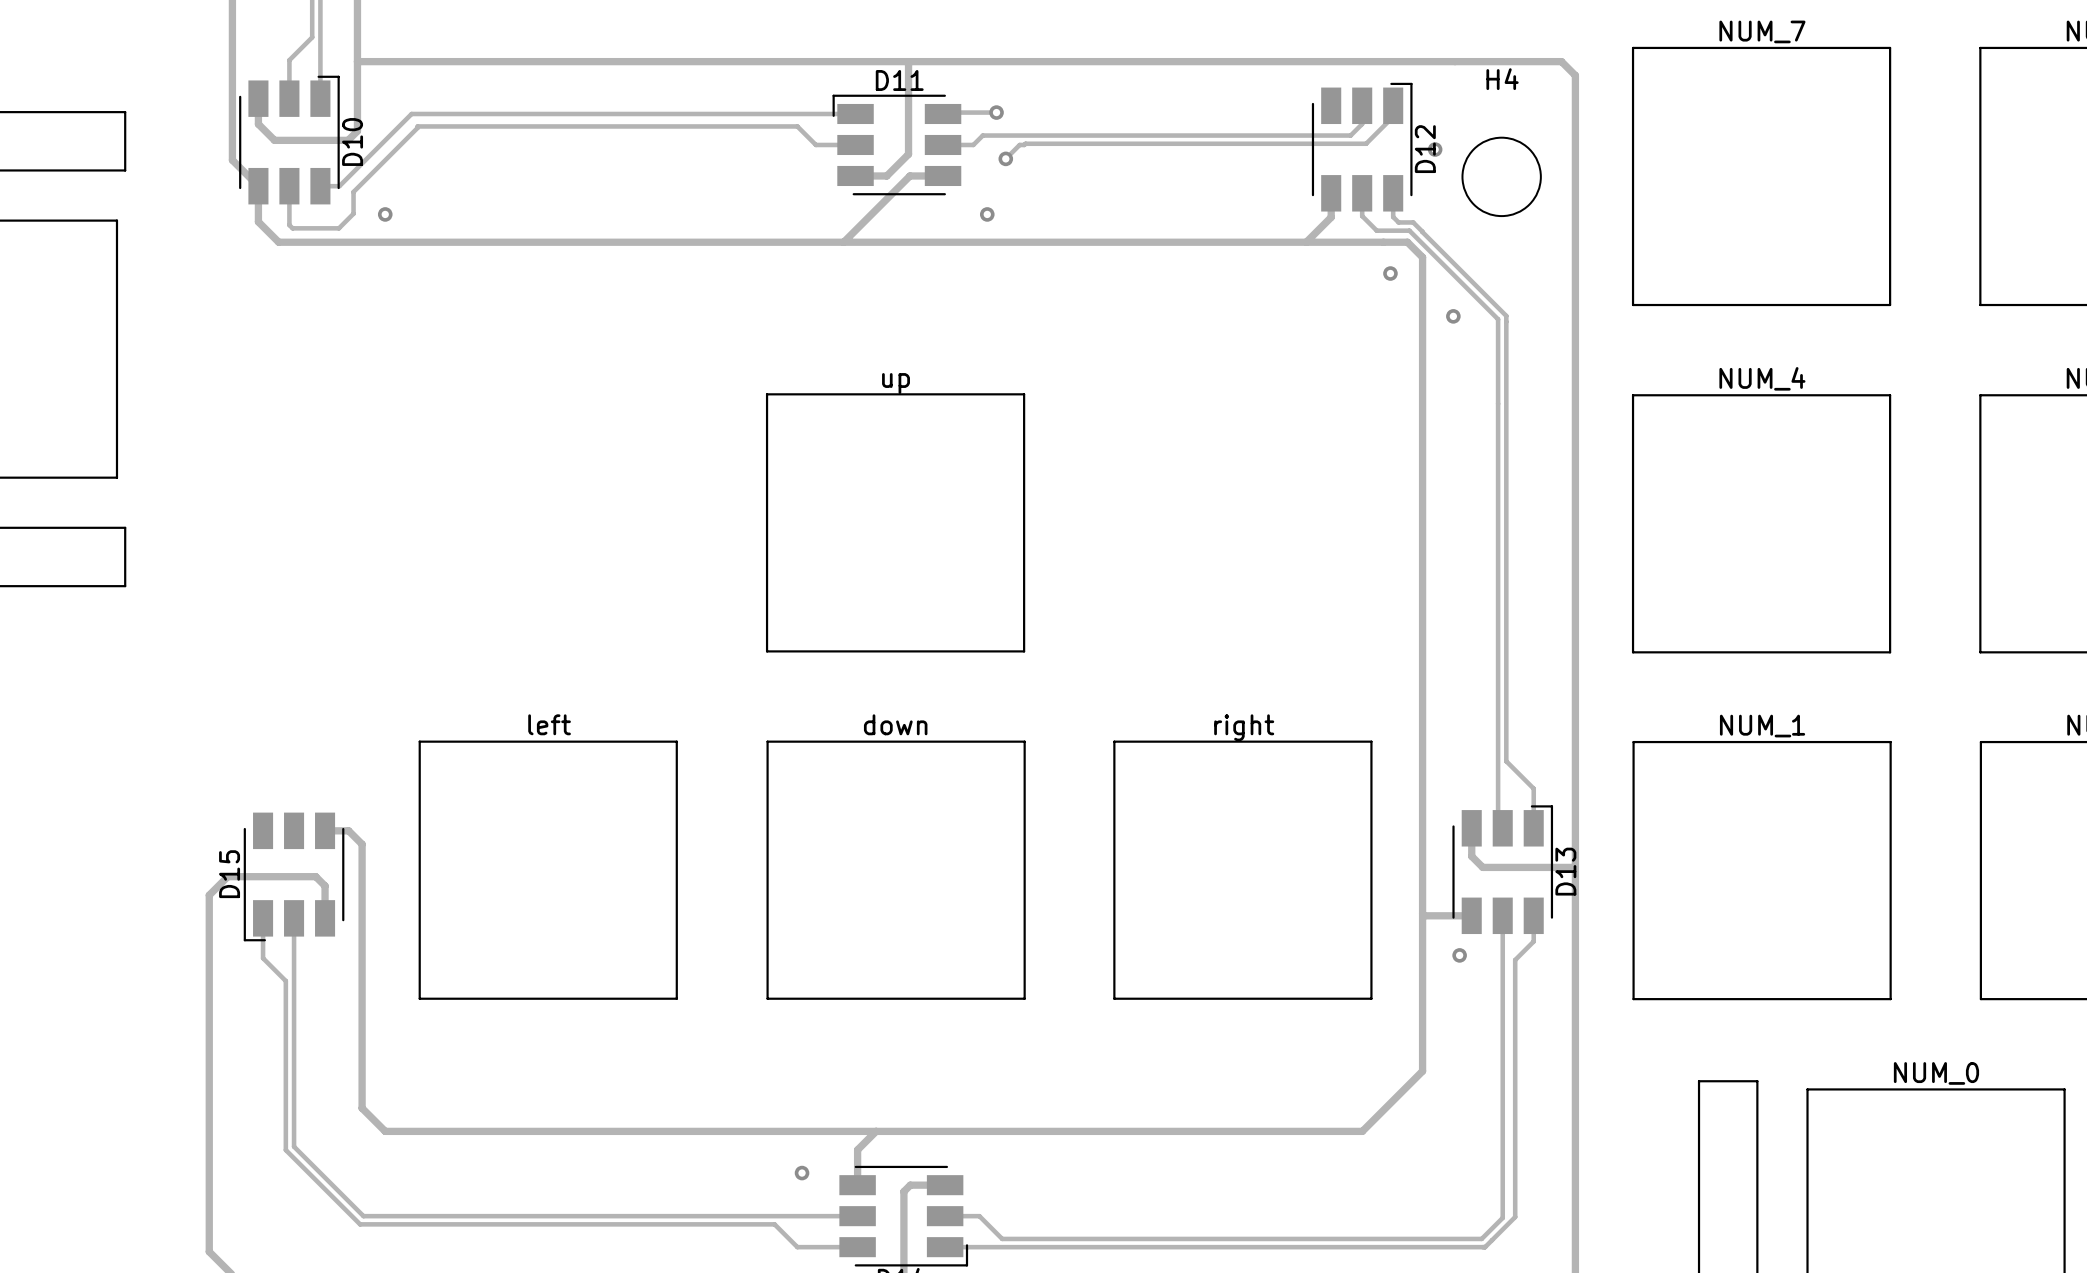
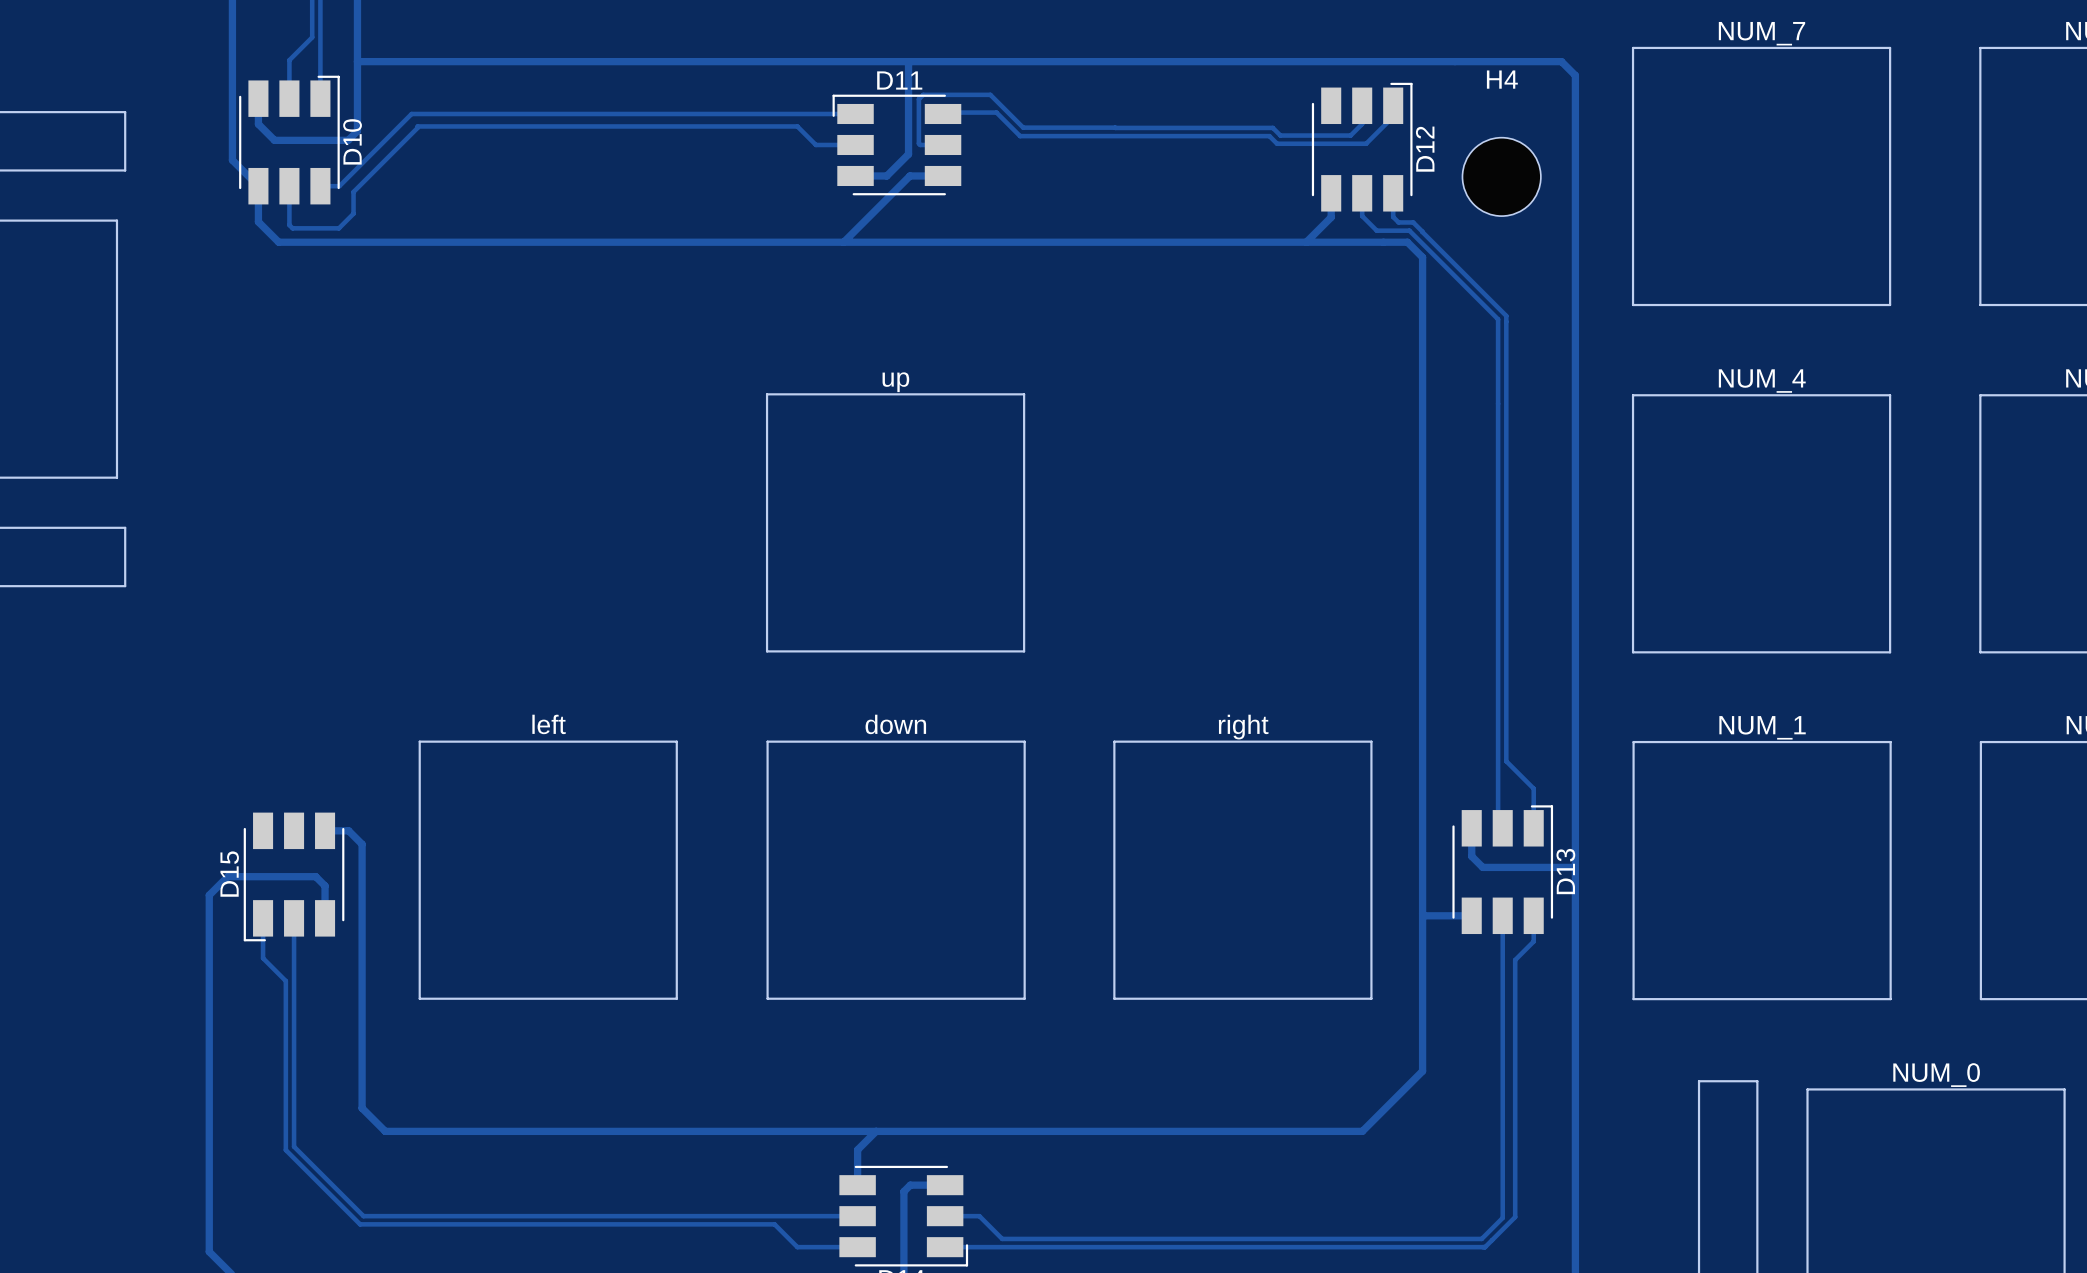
via: (996, 112) -> none
track: none -> (1115, 127) (1272, 127) (1280, 135)
track: (1280, 135) (982, 135) (973, 144) (943, 144) -> (1115, 127) (1023, 127) (990, 94) (923, 94) (918, 99) (918, 143) (943, 144)
track: (1277, 143) (1025, 143) (1019, 144) (1005, 158) -> (1277, 143) (1269, 136) (1020, 136) (996, 112)
via: (1435, 149) -> none
via: (1005, 158) -> none
via: (385, 214) -> none
via: (987, 214) -> none
via: (1390, 273) -> none
via: (1453, 316) -> none
via: (1459, 955) -> none
via: (802, 1173) -> none

